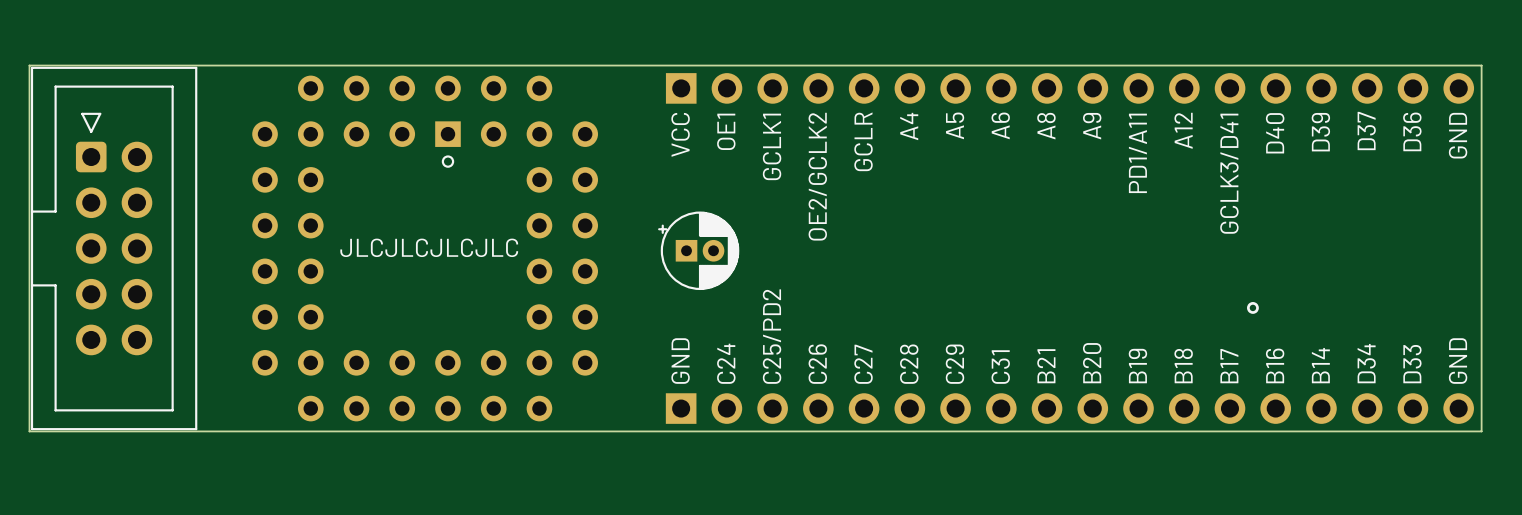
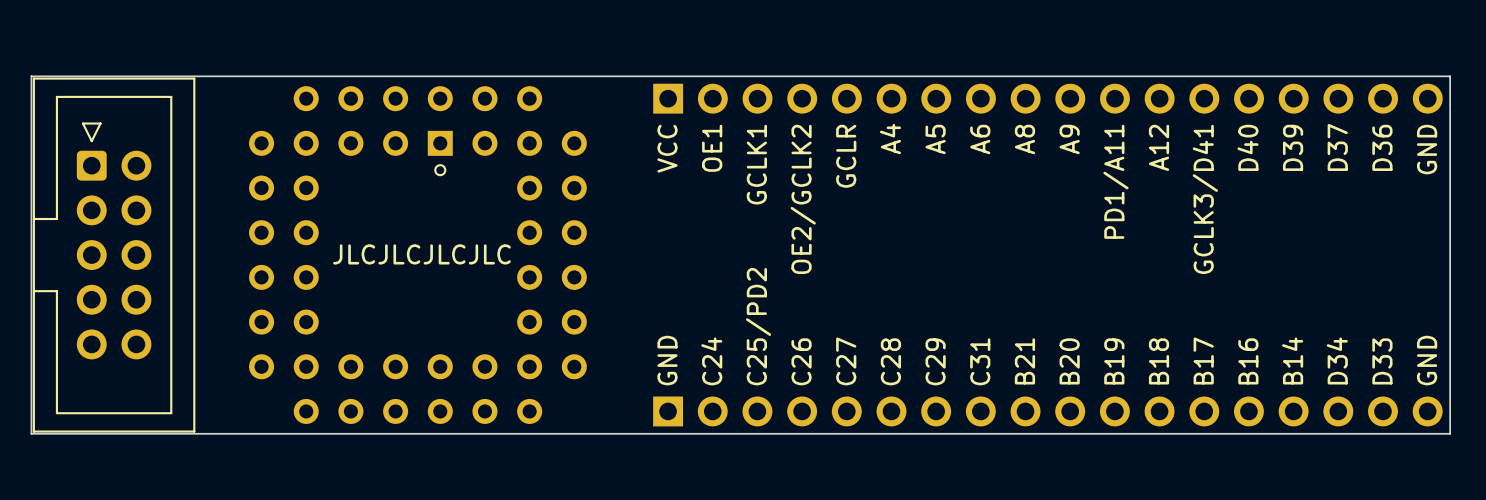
part: (698, 250) -> none
drawing: [1247, 302, 1259, 314] -> none

